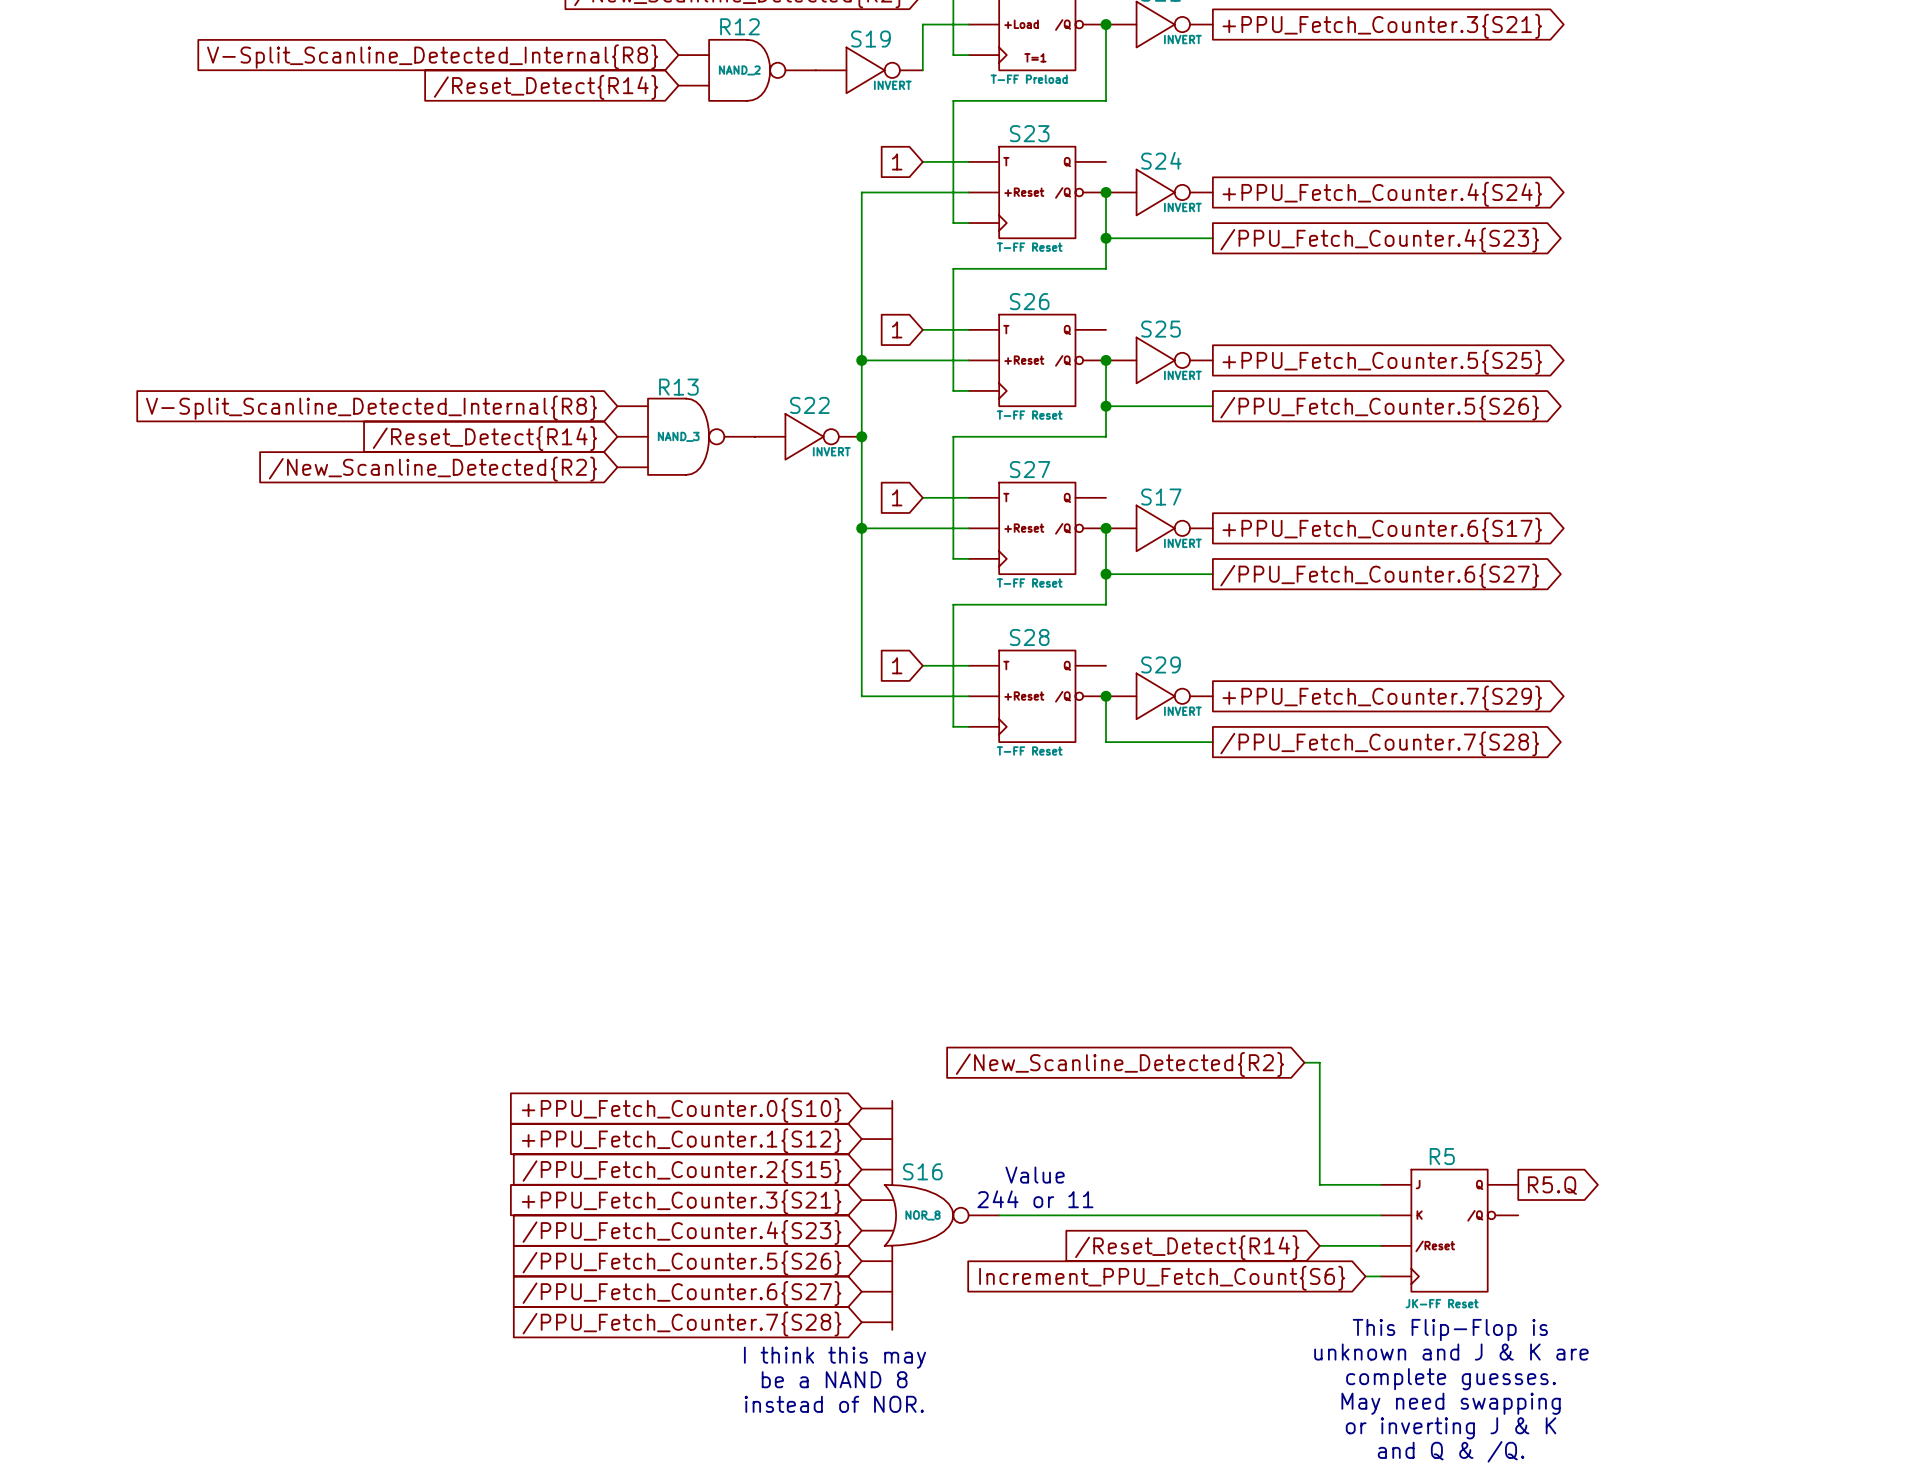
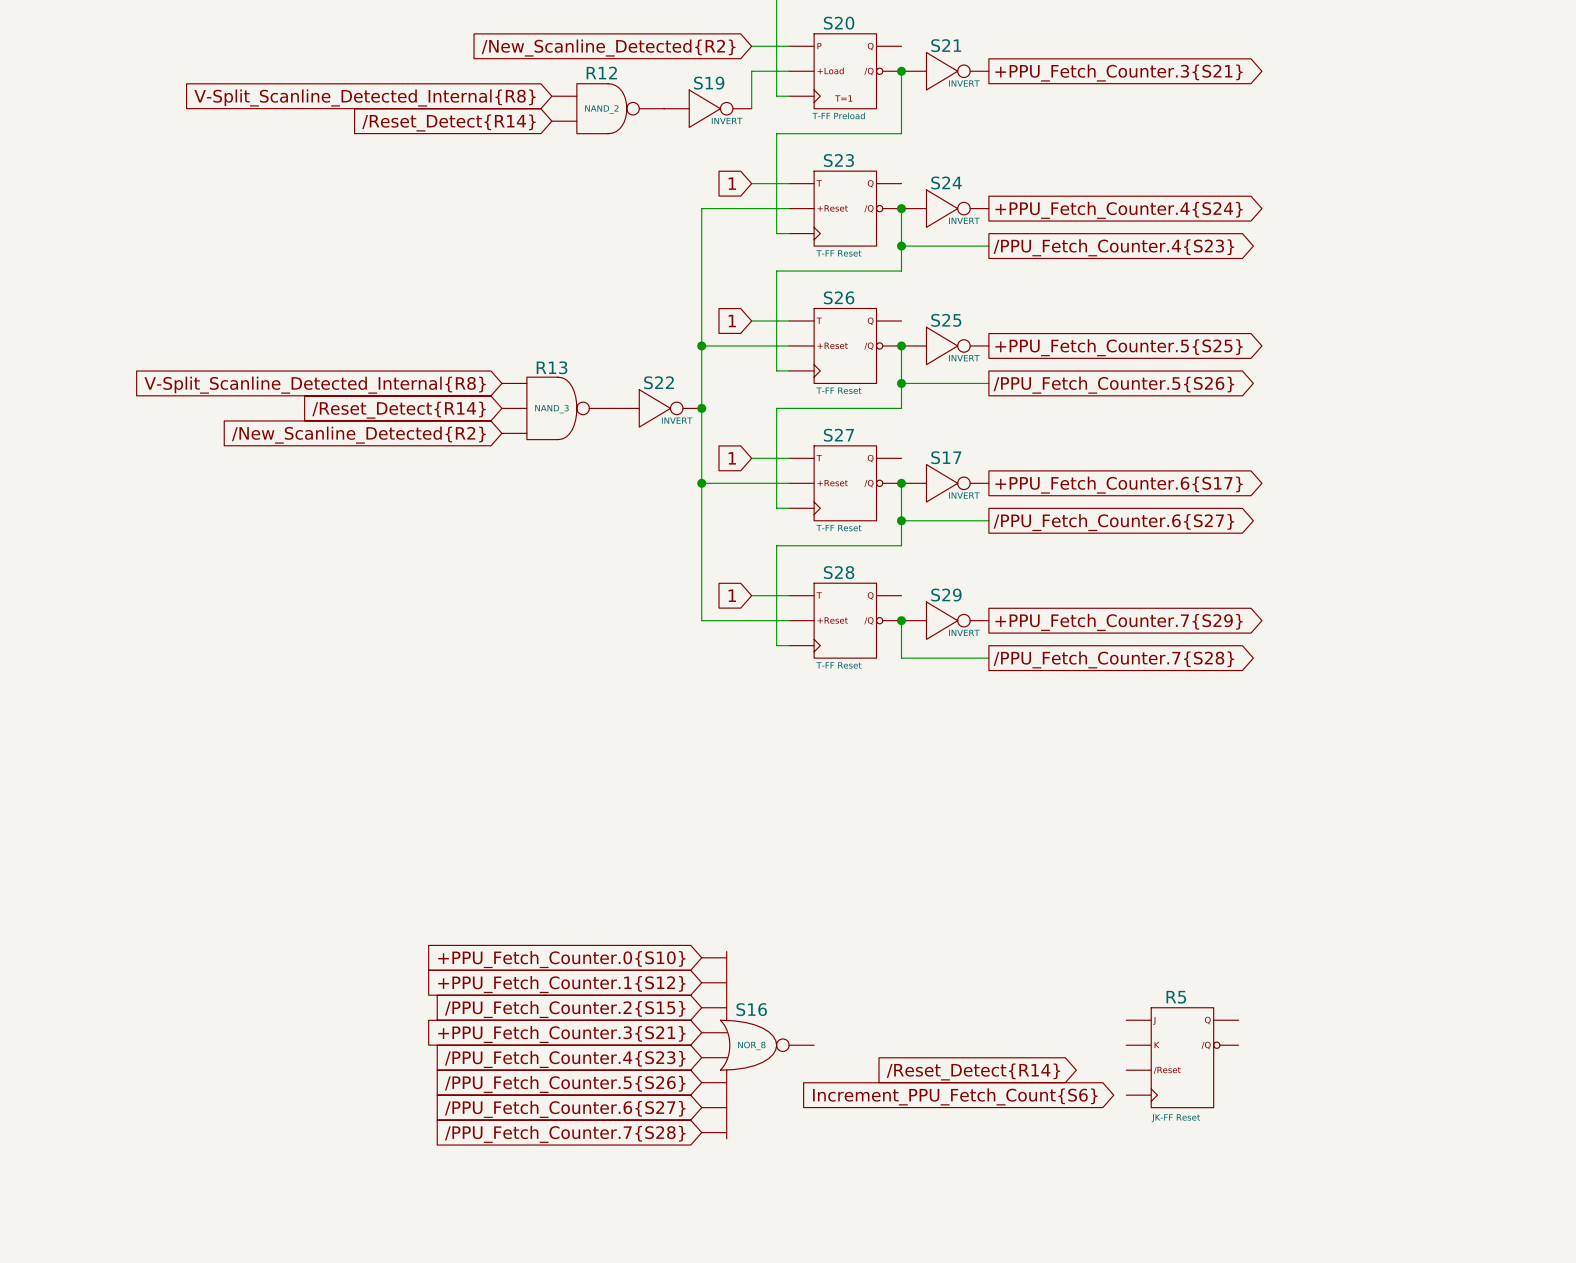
wire: (1304, 1062) (1319, 1062) (1319, 1184) (1380, 1184) -> none
global label: /New_Scanline_Detected{R2} (1119, 1064) -> none
text: Value (1035, 1175) -> none
global label: R5.Q (1552, 1185) -> none
text: 244 or 11 (1035, 1199) -> none
wire: (999, 1215) (1380, 1215) -> none
wire: (1319, 1245) (1380, 1245) -> none
wire: (1365, 1276) (1380, 1276) -> none
text: This Flip-Flop is (1450, 1330) -> none
text: unknown and J & K are (1451, 1352) -> none
text: I think this may (834, 1357) -> none
text: be a NAND 8 (834, 1379) -> none
text: complete guesses. (1451, 1379) -> none
text: May need swapping (1451, 1403) -> none
text: instead of NOR. (834, 1404) -> none
text: or inverting J & K (1451, 1428) -> none
text: and Q & /Q. (1451, 1451) -> none

